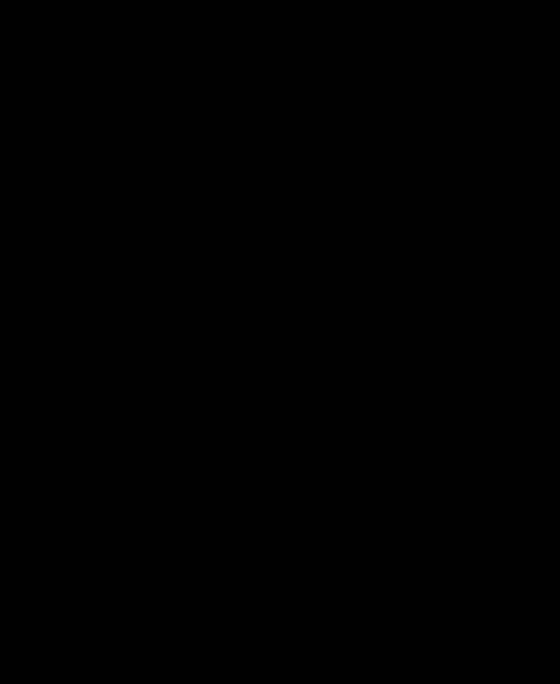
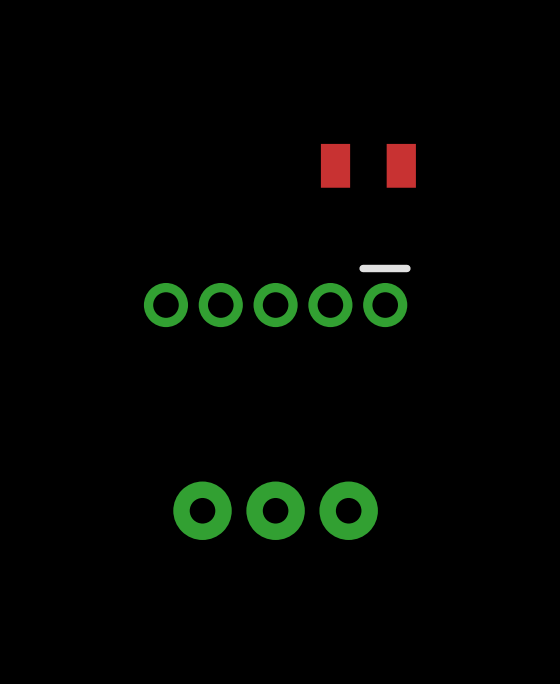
part: none -> (368, 165)
part: none -> (277, 295)
part: none -> (275, 510)

